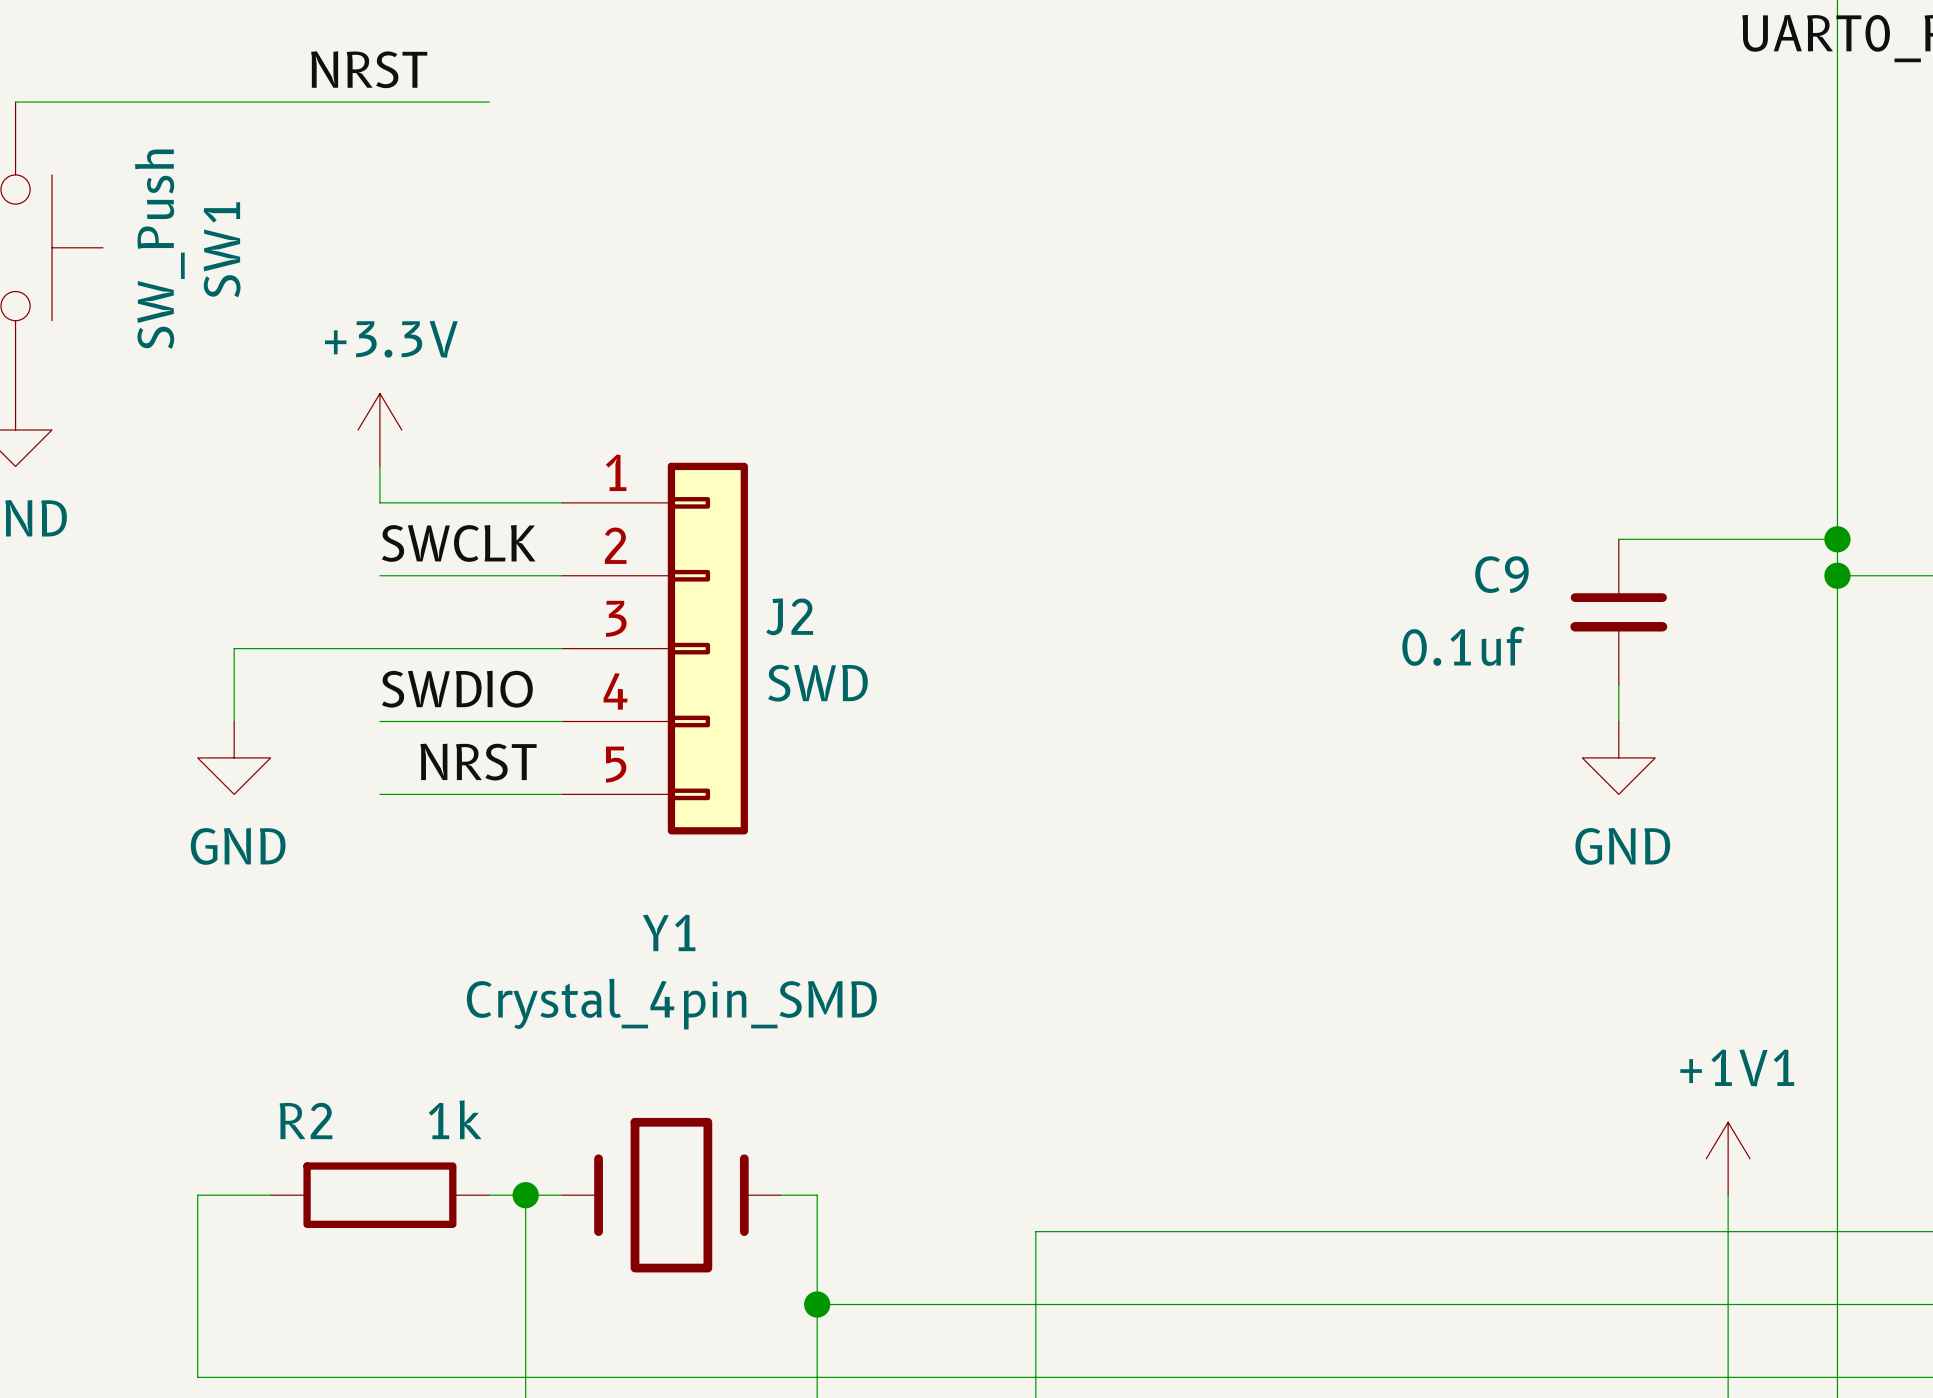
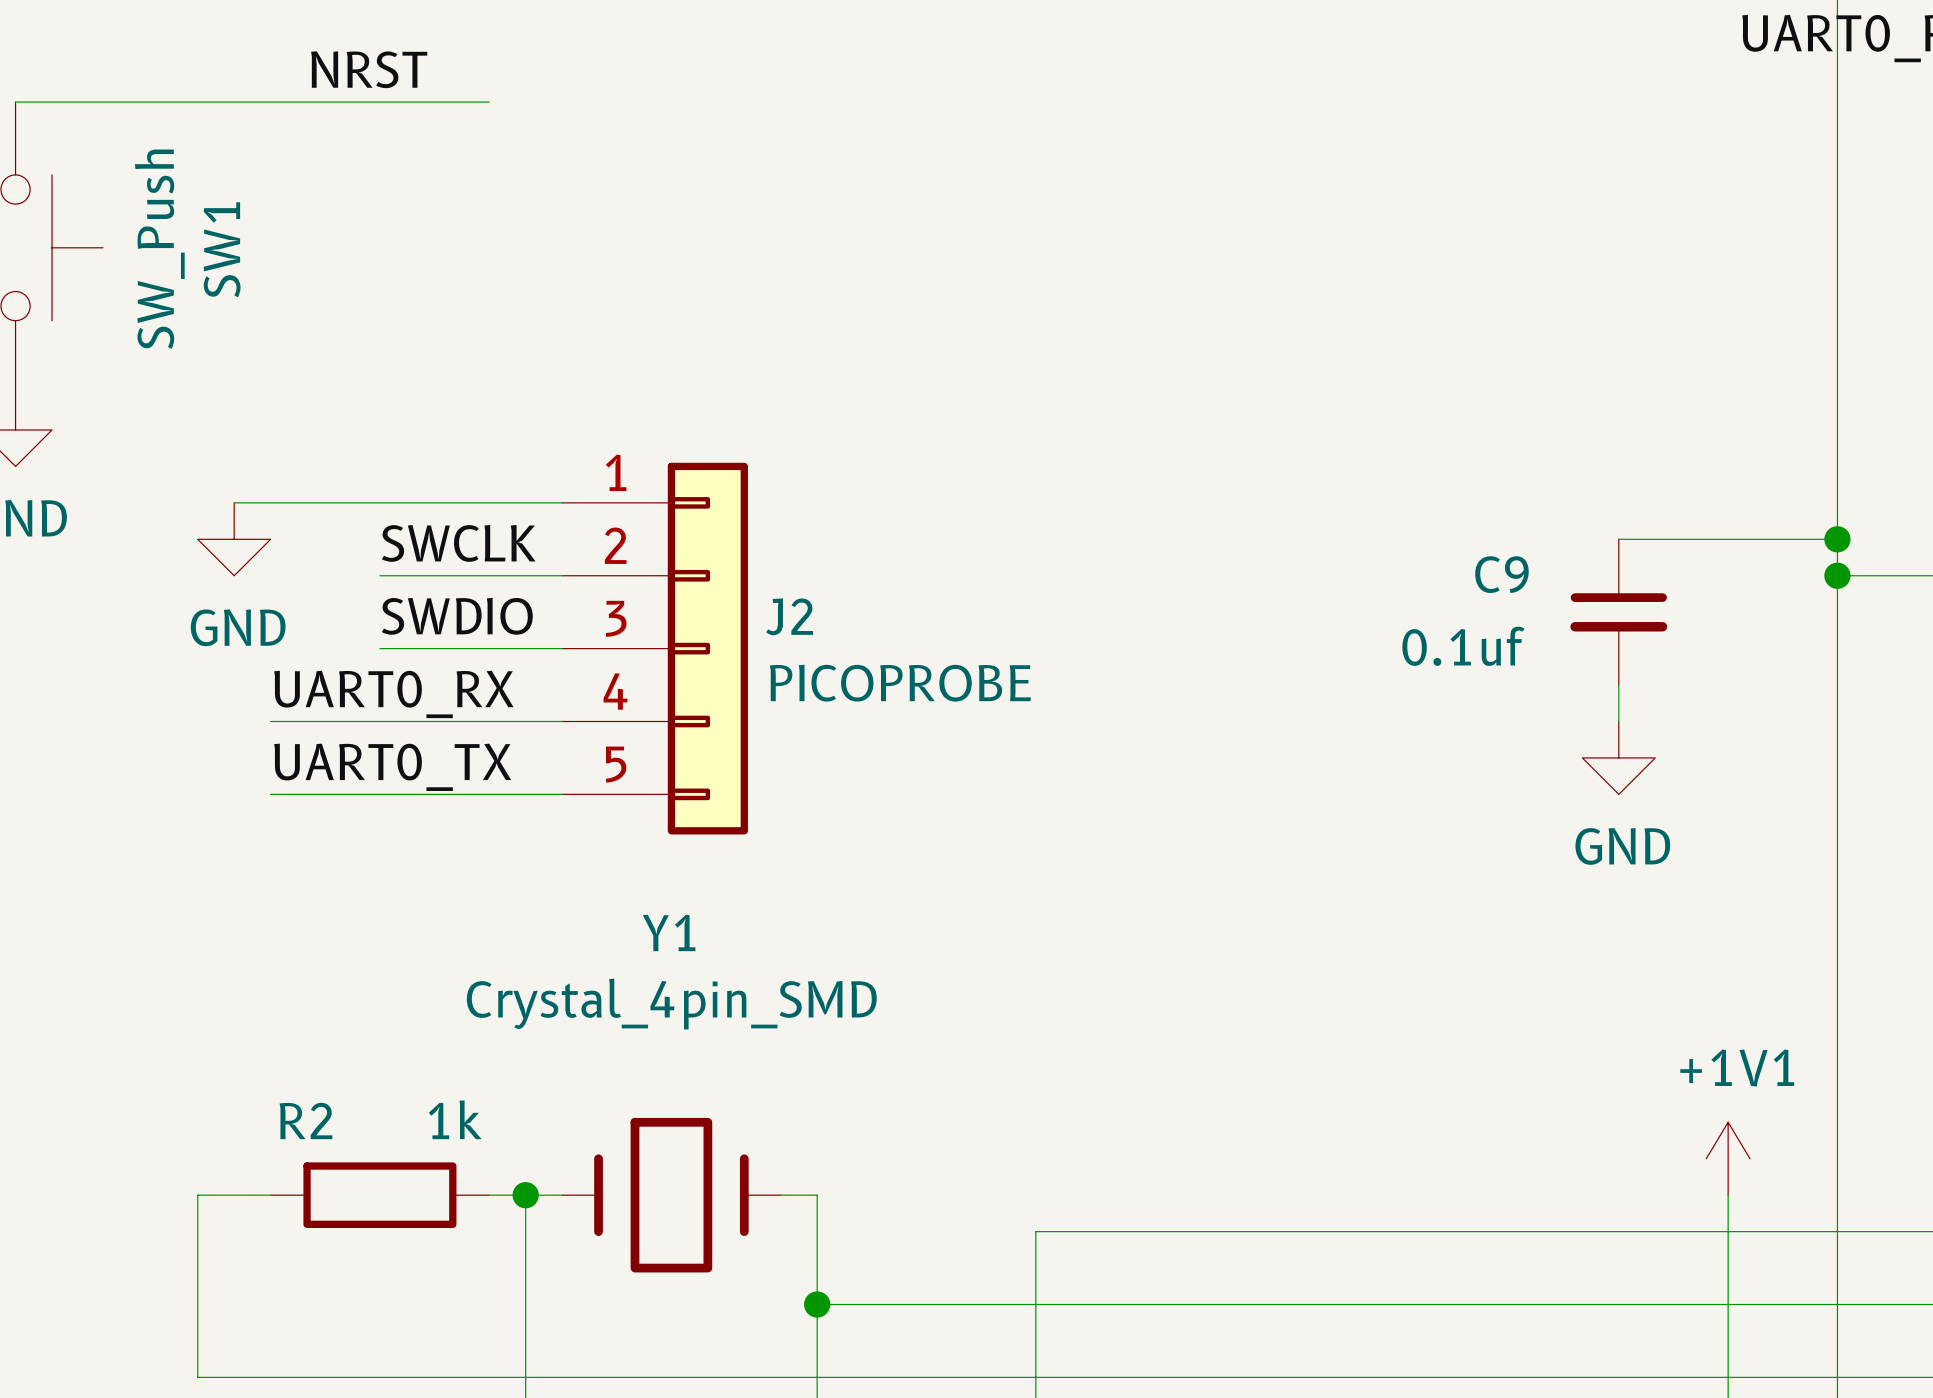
power symbol: +3.3V (379, 429) -> none
wire: (379, 466) (379, 502) -> (234, 502) (379, 502)
wire: (379, 648) (234, 648) (234, 721) -> none
J2 value: SWD (817, 683) -> PICOPROBE (900, 683)
label position: SWDIO (457, 689) -> SWDIO (457, 616)
label: none -> UART0_RX (393, 694)
wire: none -> (270, 721) (379, 721)
power symbol position: GND (234, 757) -> GND (234, 539)
label: NRST (478, 762) -> none
label: none -> UART0_TX (392, 767)
wire: none -> (270, 794) (379, 794)

